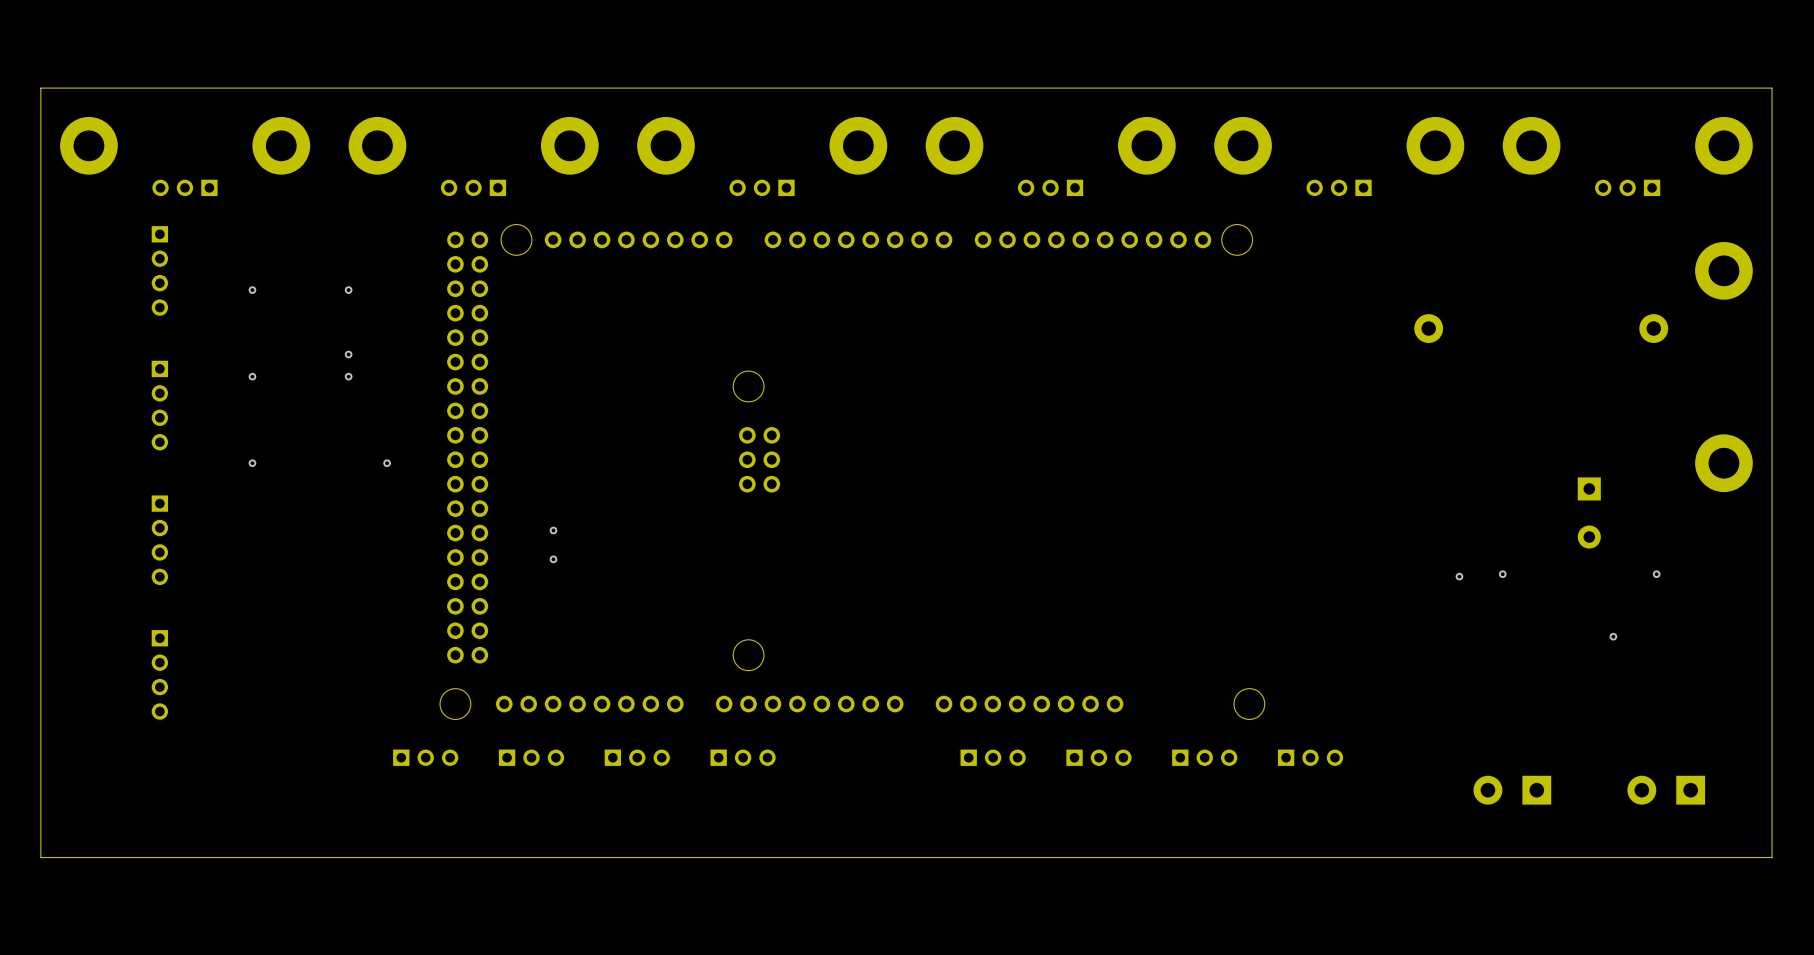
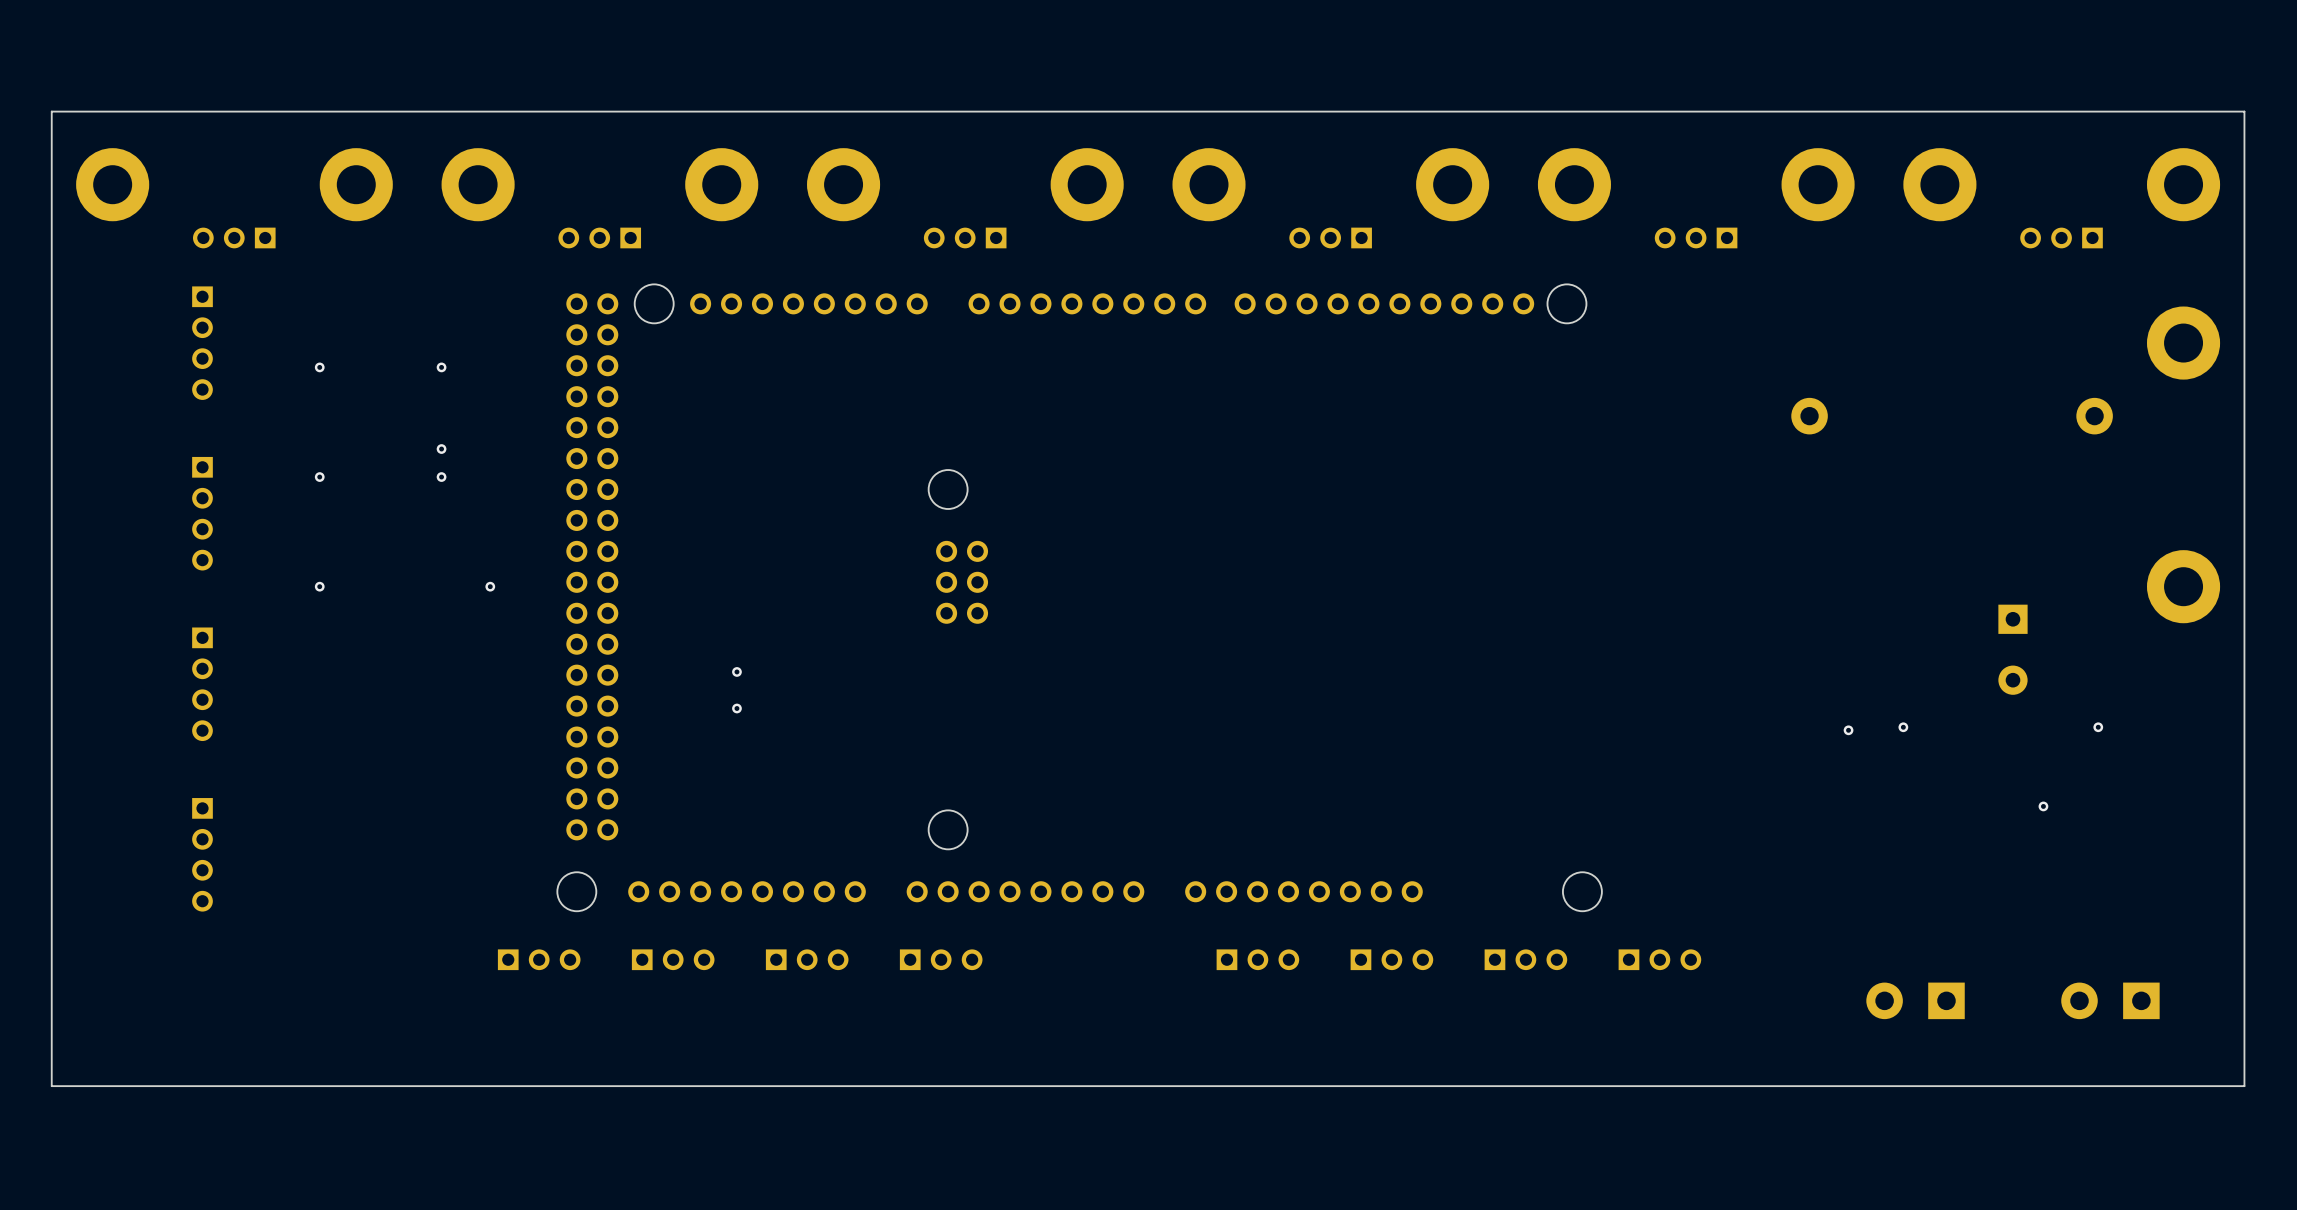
via: (553, 530) -> none
via: none -> (736, 671)
via: (553, 559) -> none
via: none -> (736, 708)

